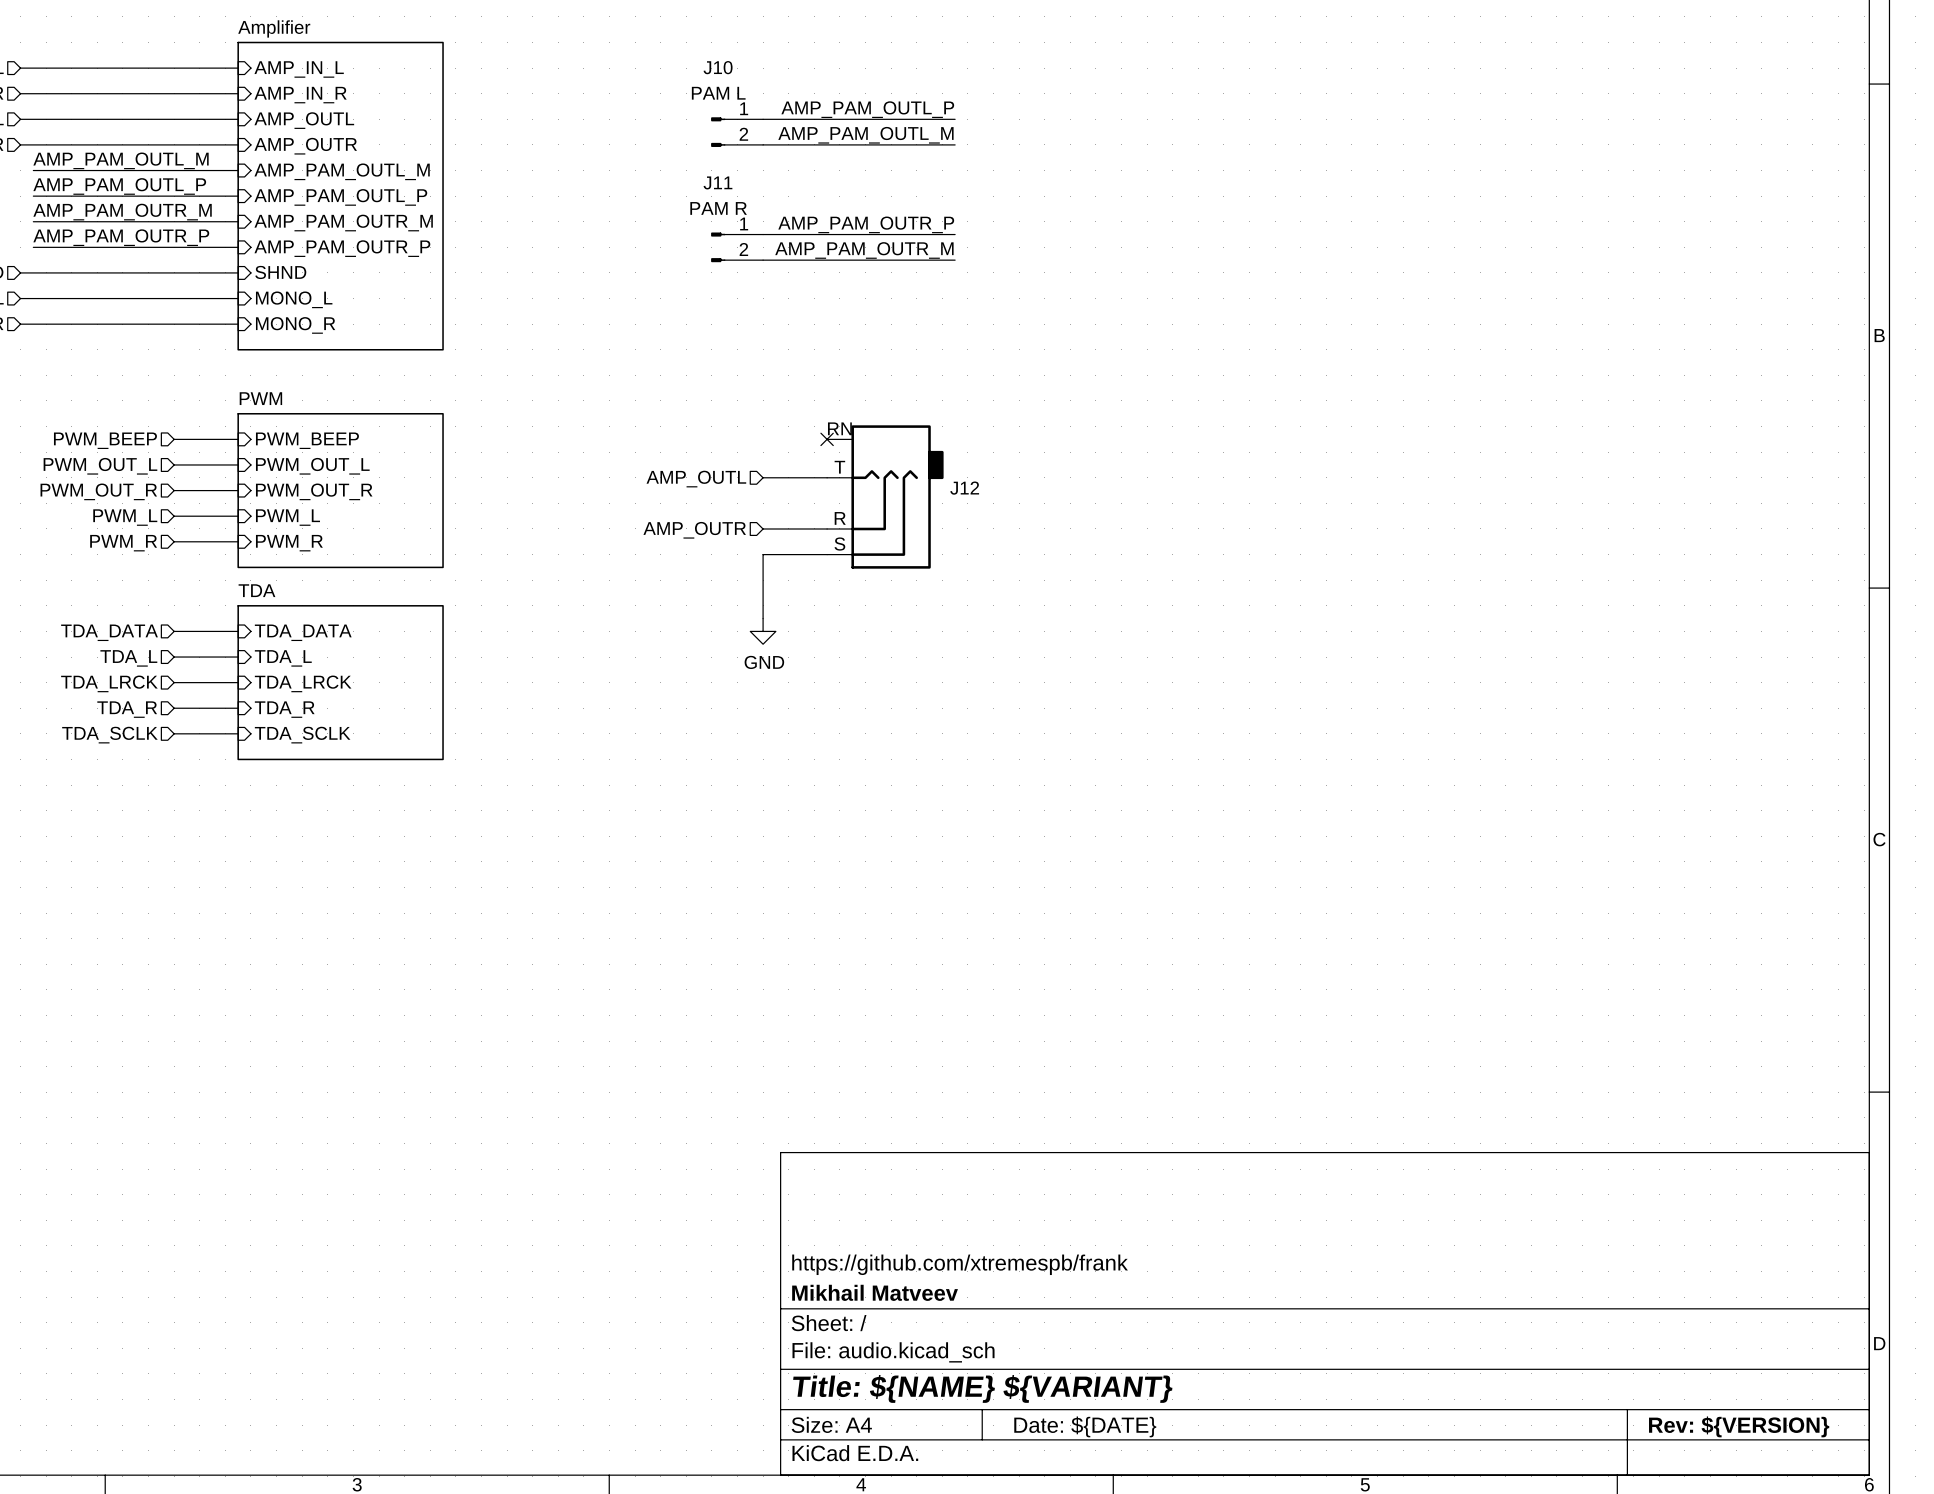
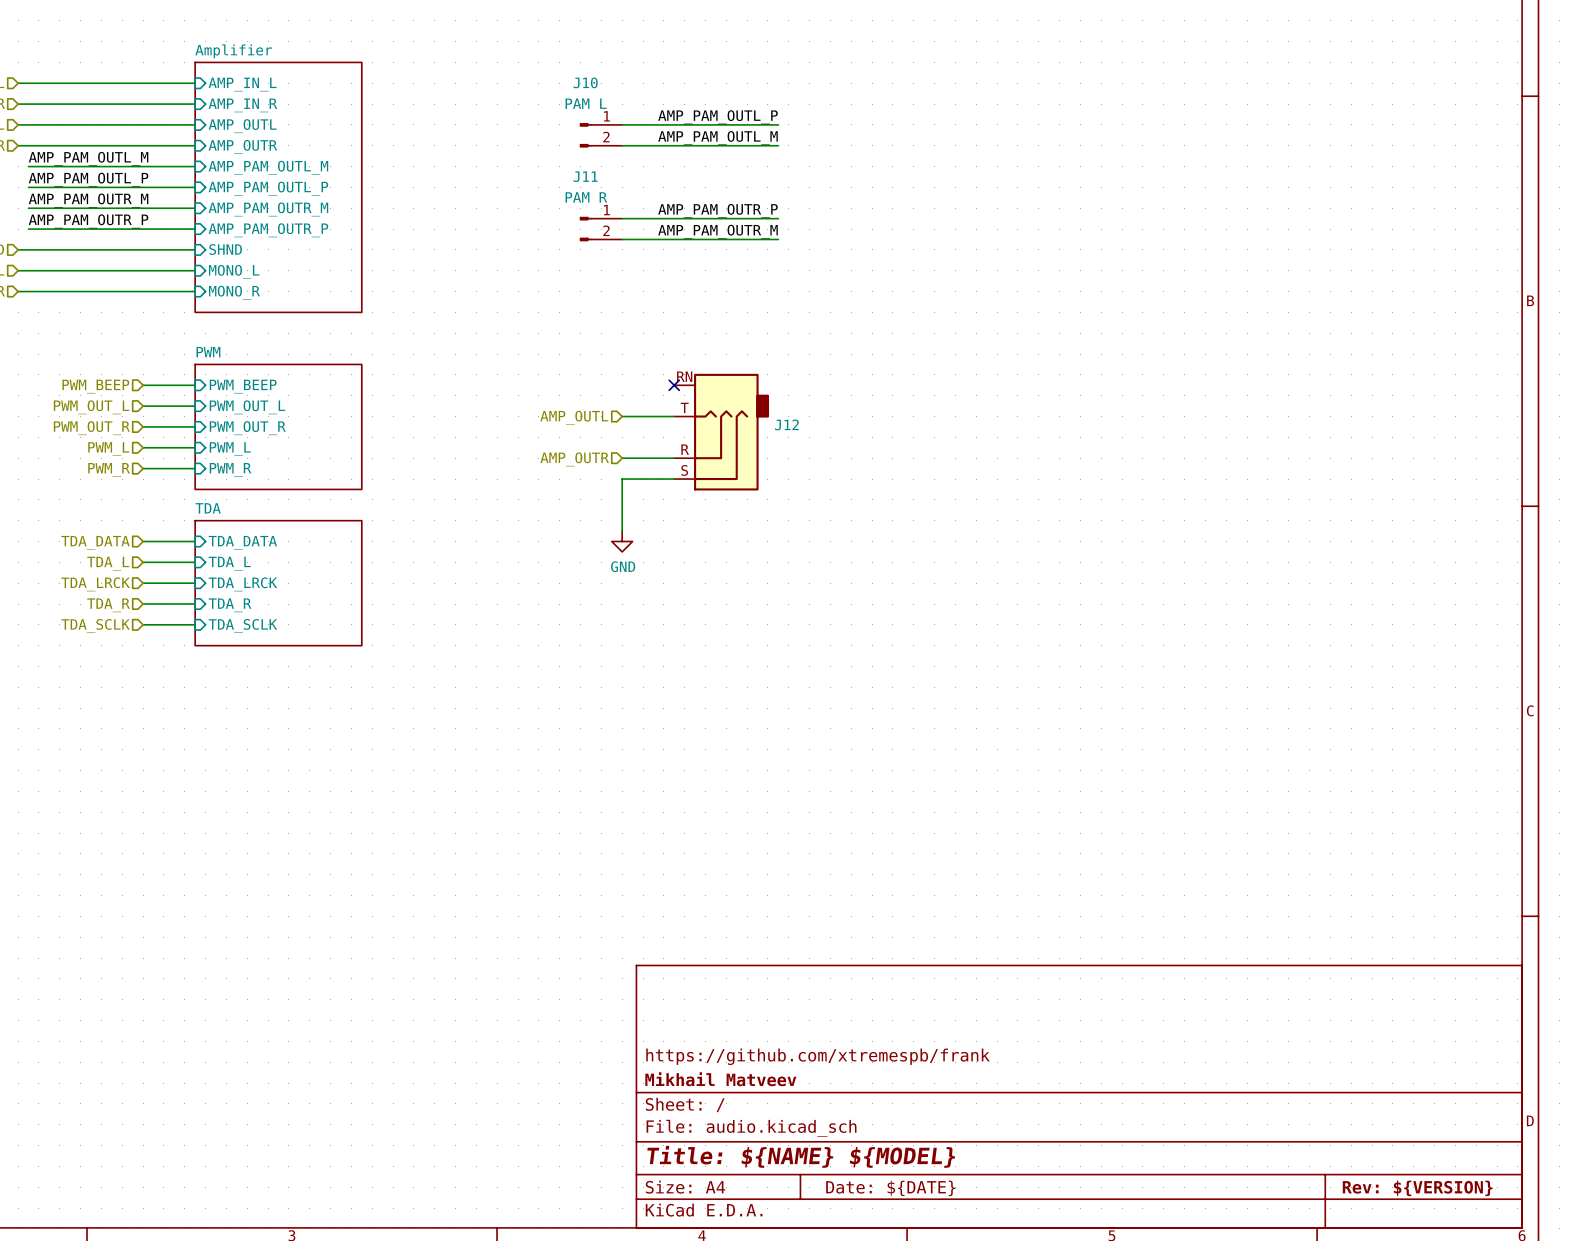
title block: Title: ${NAME} ${VARIANT} (982, 1388) -> Title: ${NAME} ${MODEL} (801, 1156)

